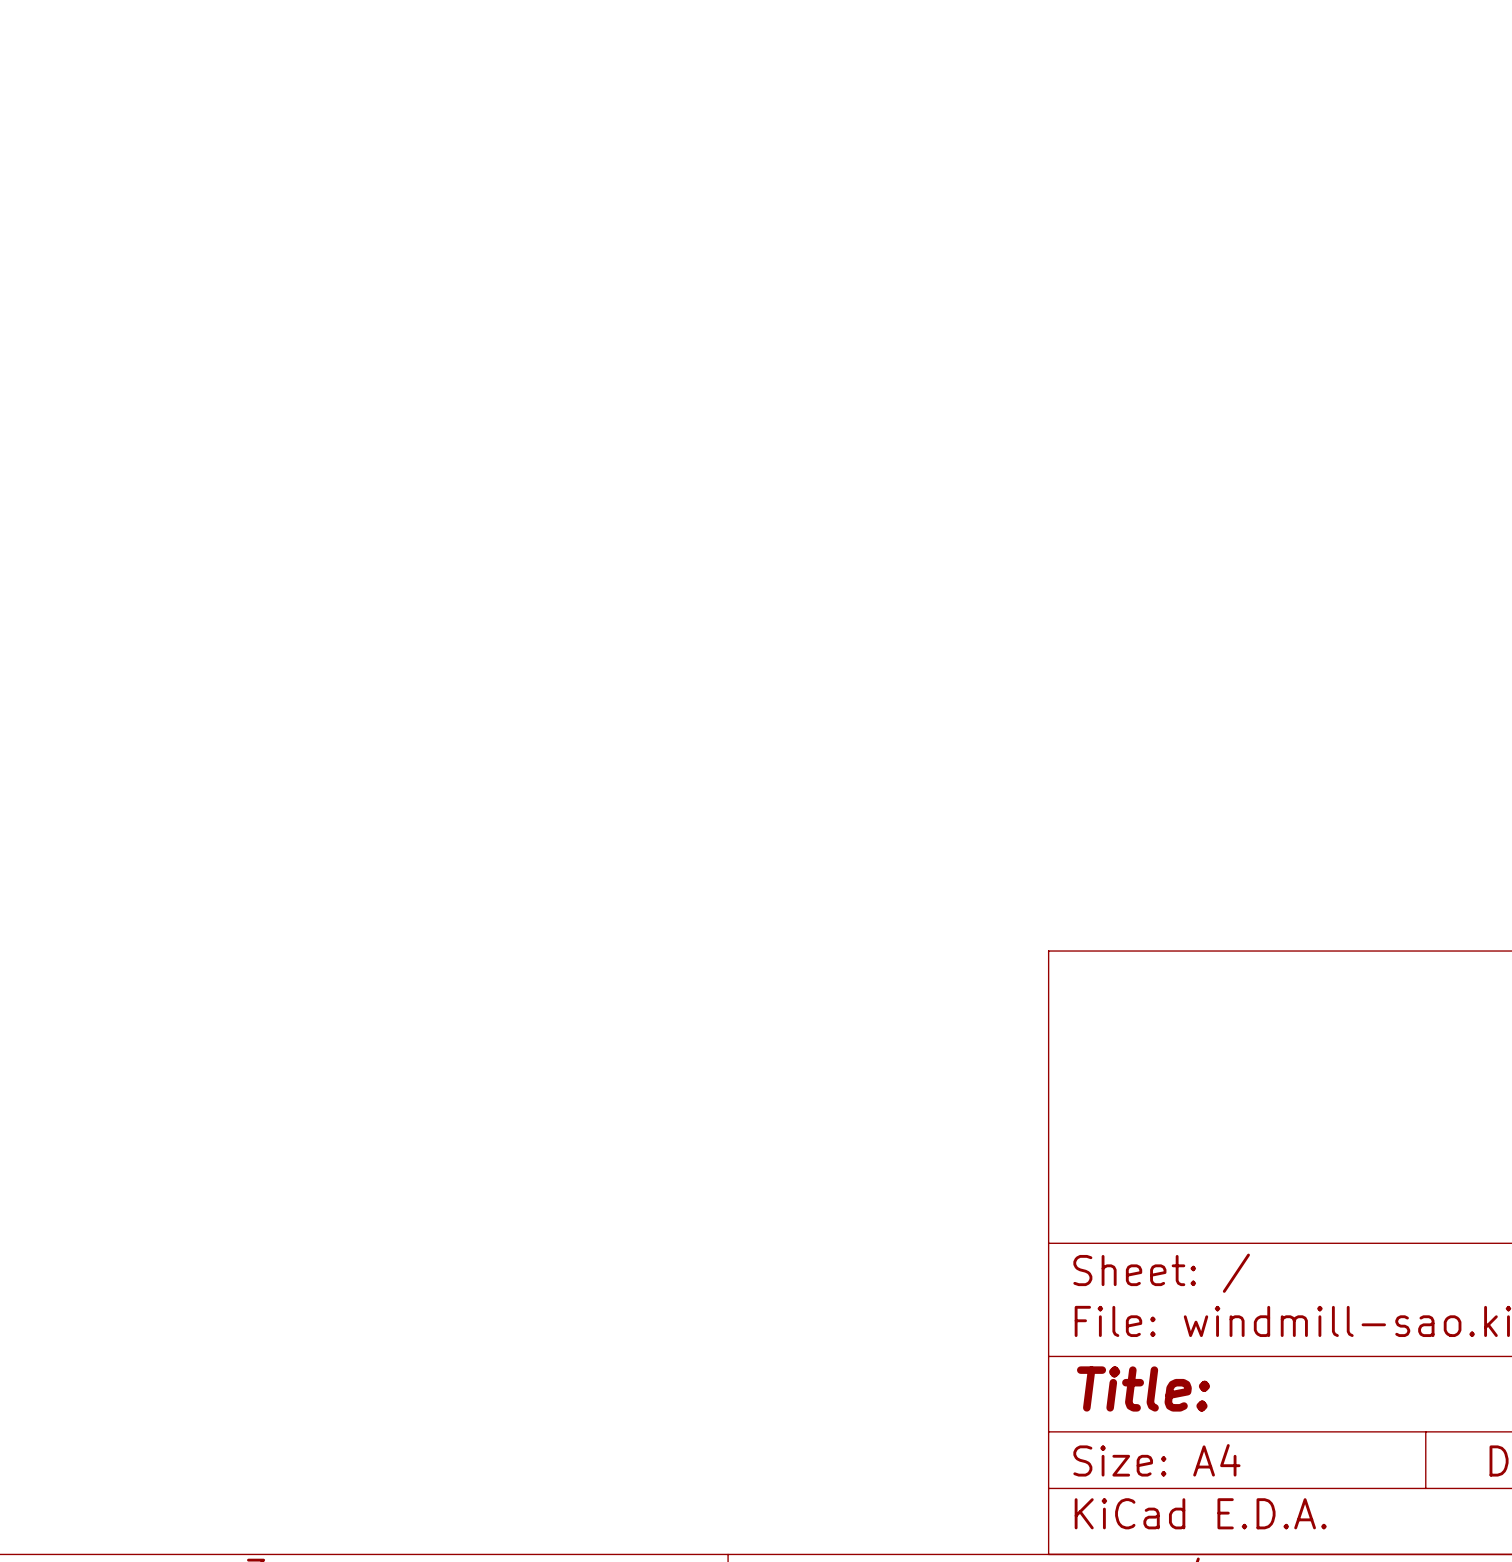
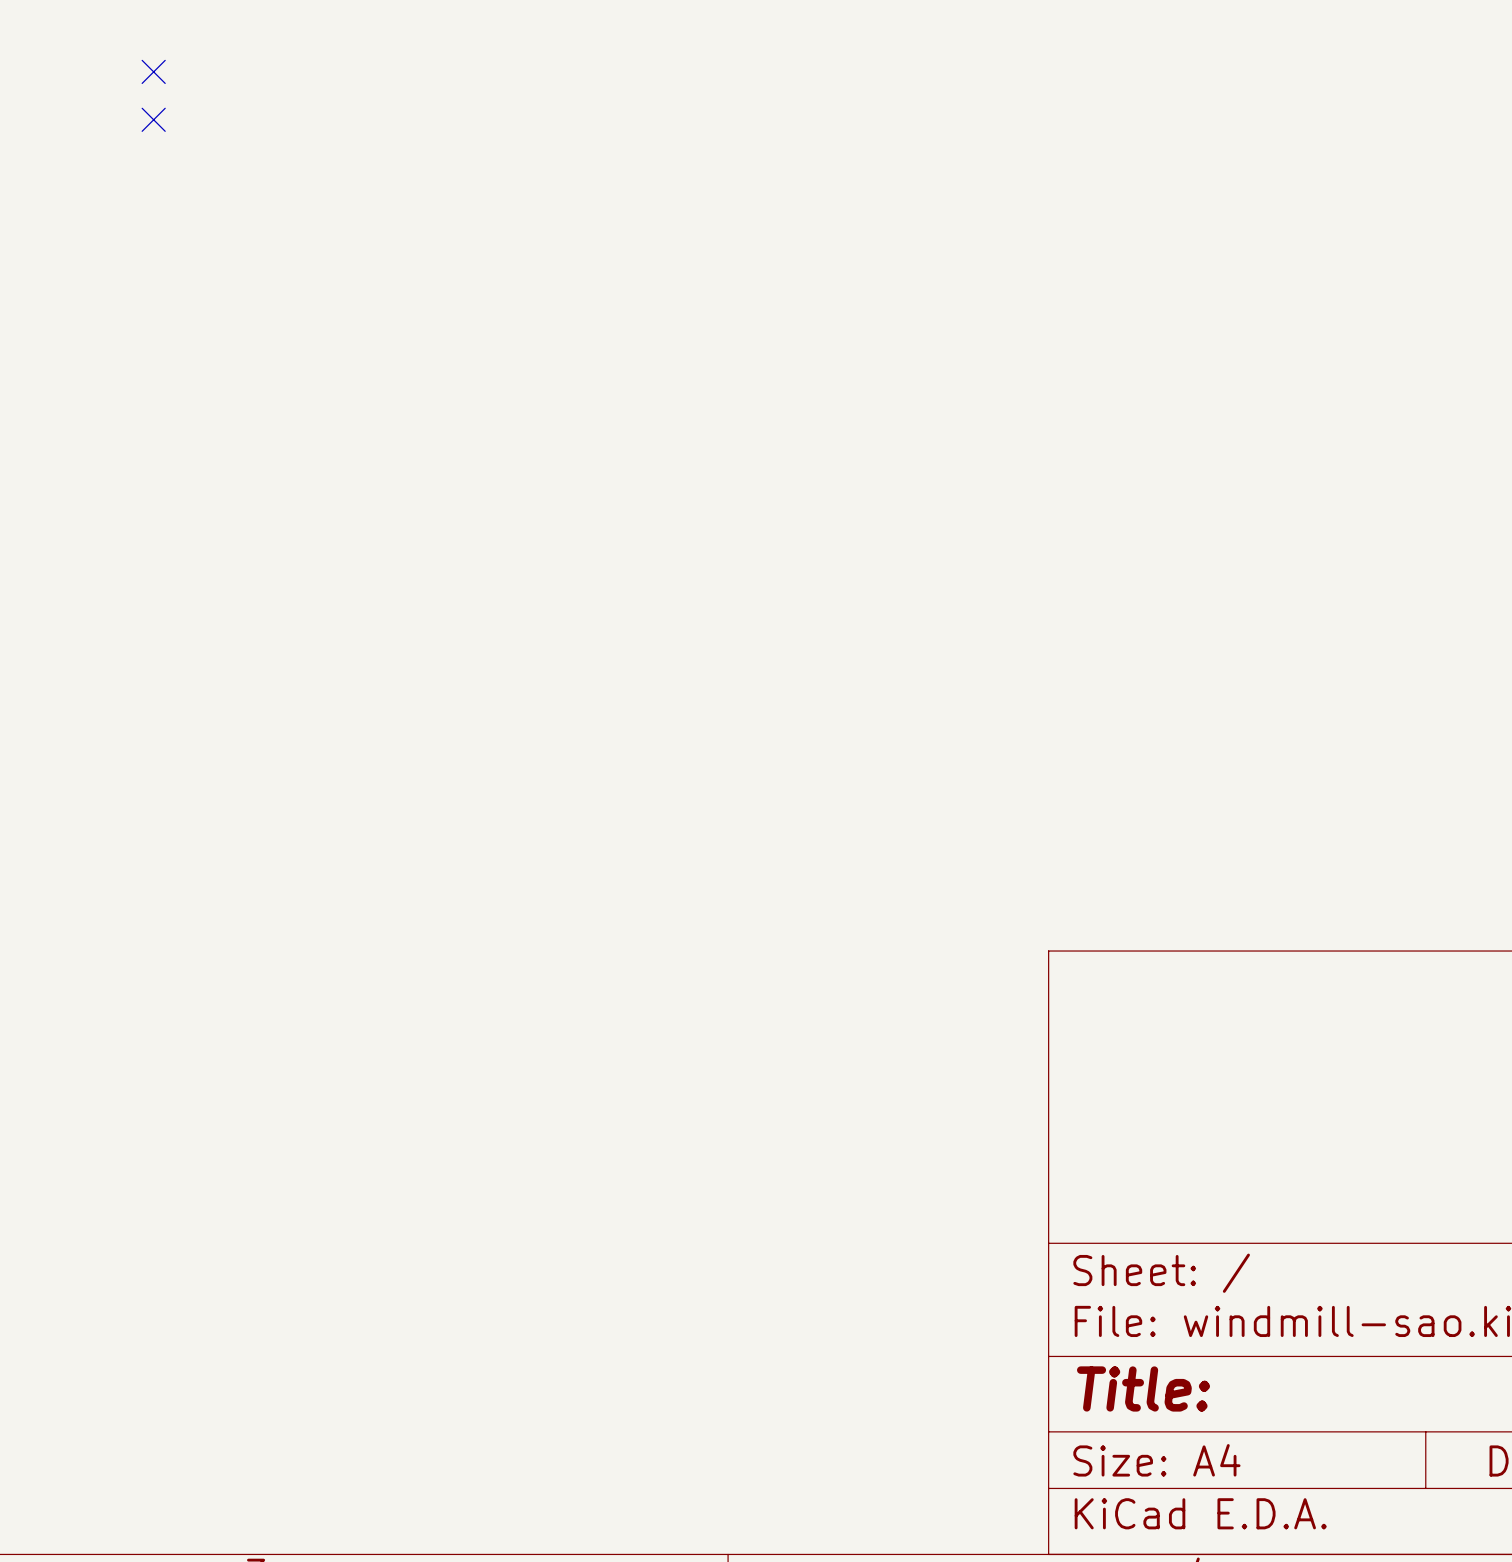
no-connect mark: none -> (153, 71)
no-connect mark: none -> (153, 119)

